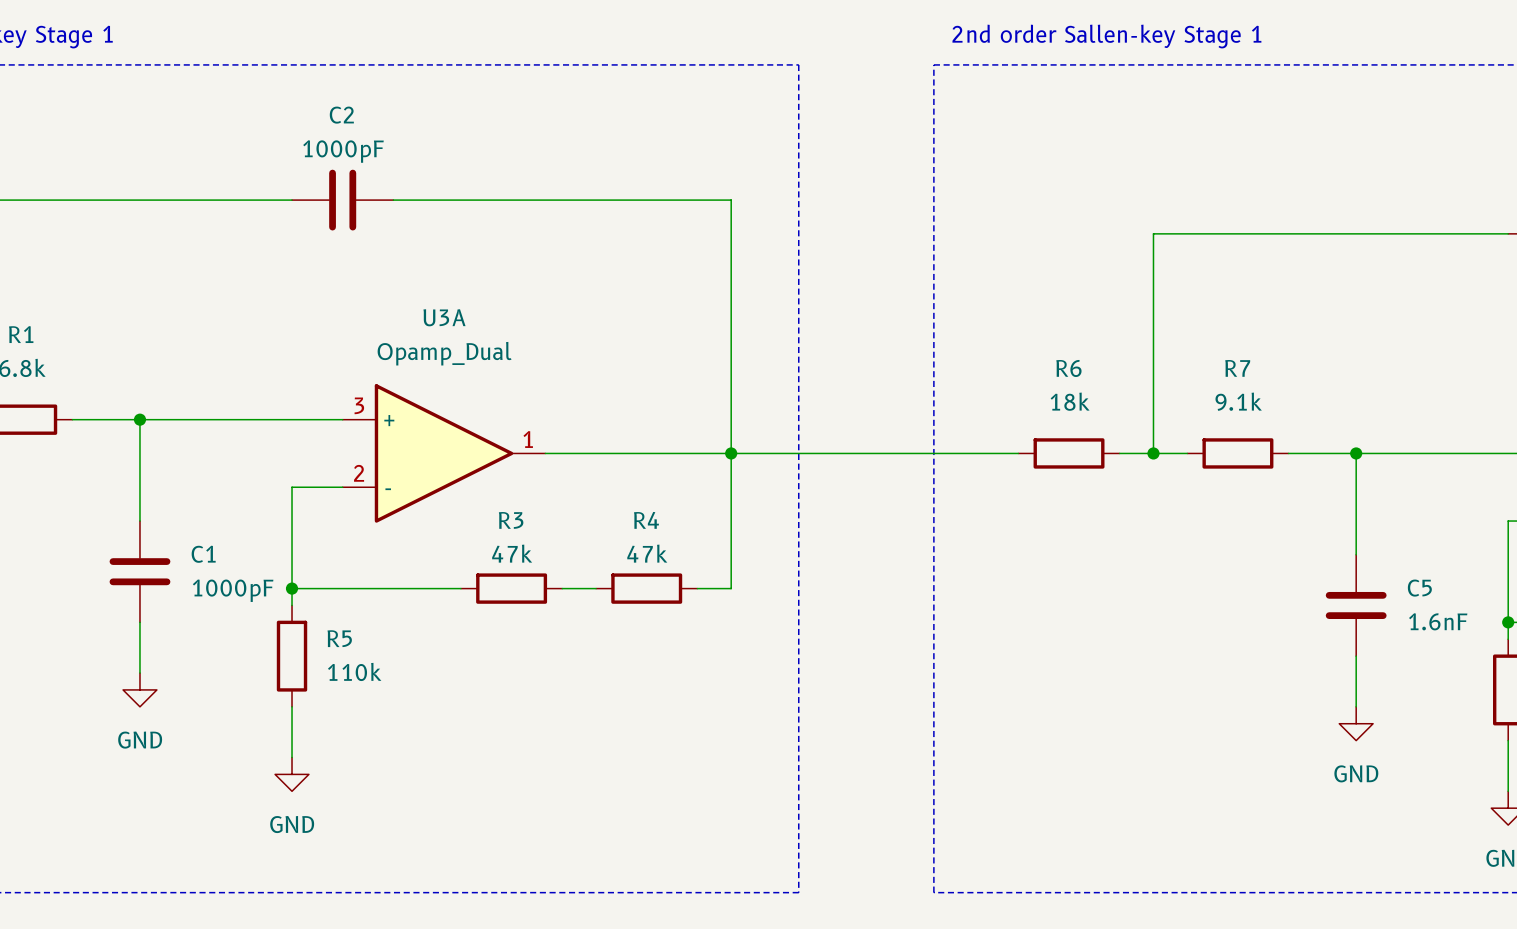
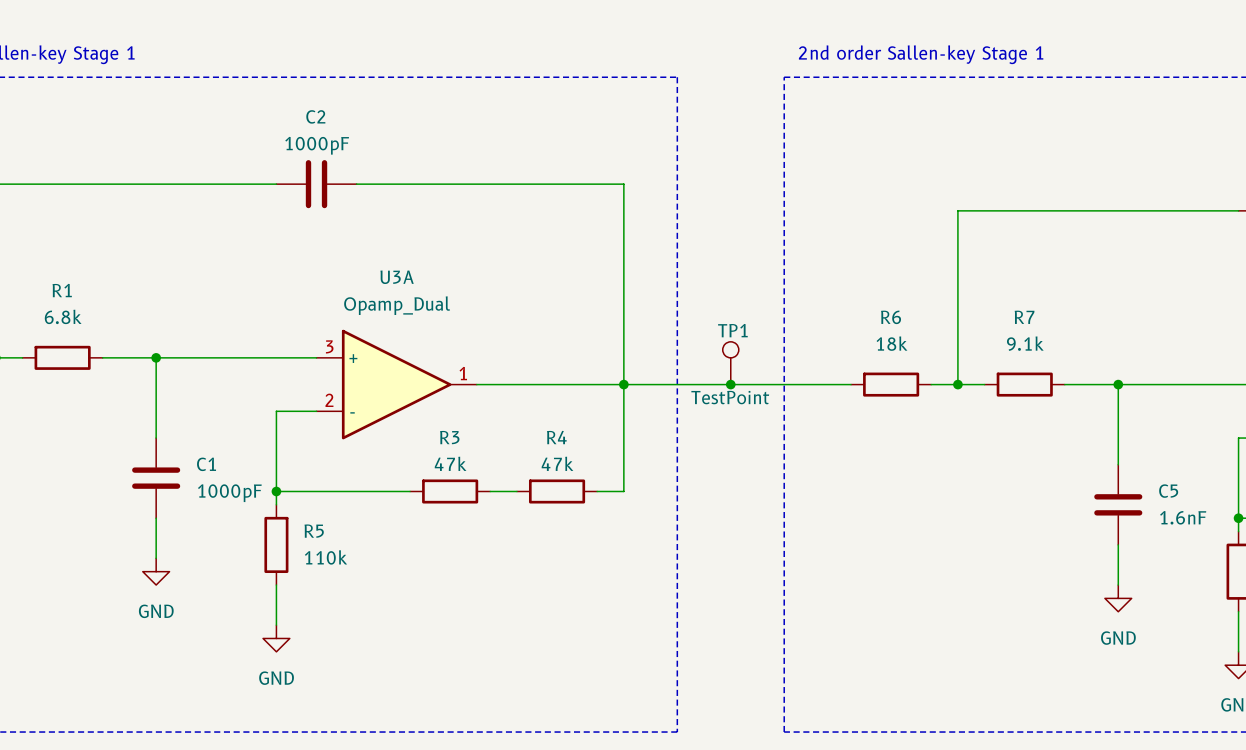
TP1: none -> TestPoint (730, 363)
junction: none -> (730, 384)

